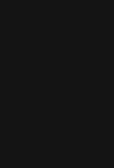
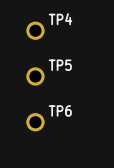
TP4: none -> (35, 30)
TP5: none -> (35, 76)
TP6: none -> (35, 122)

